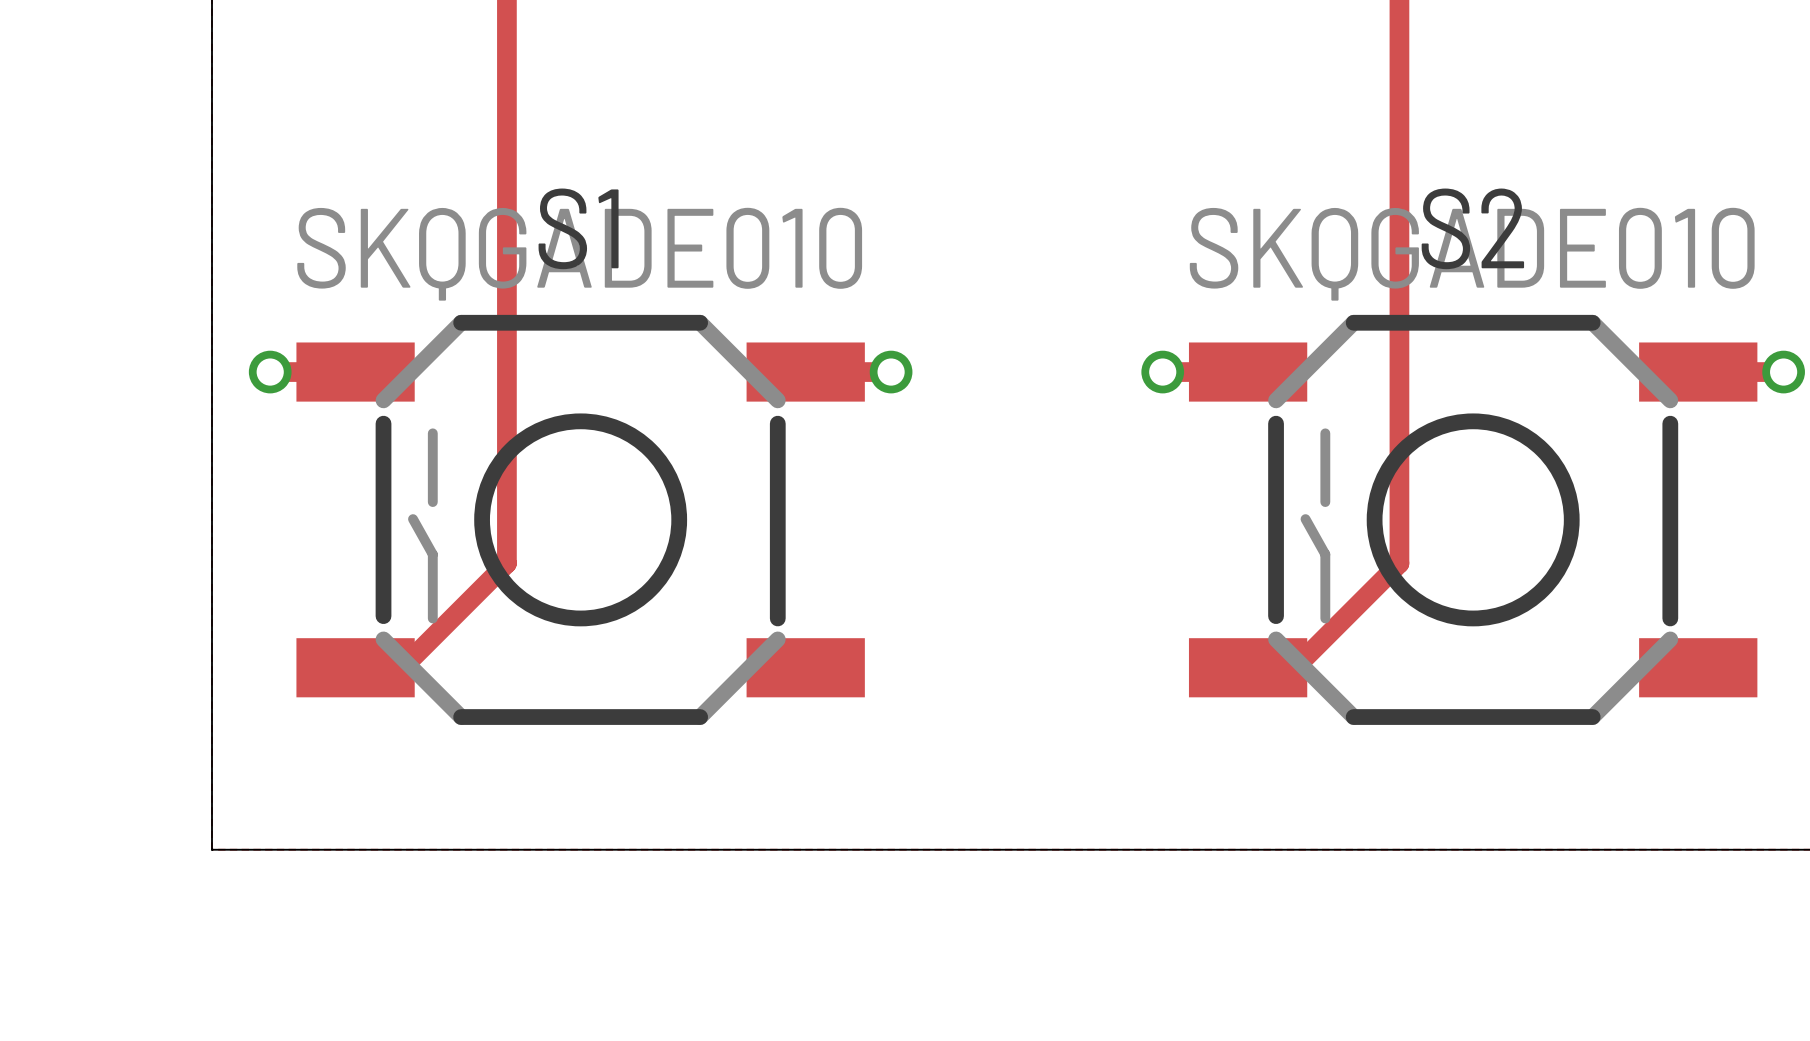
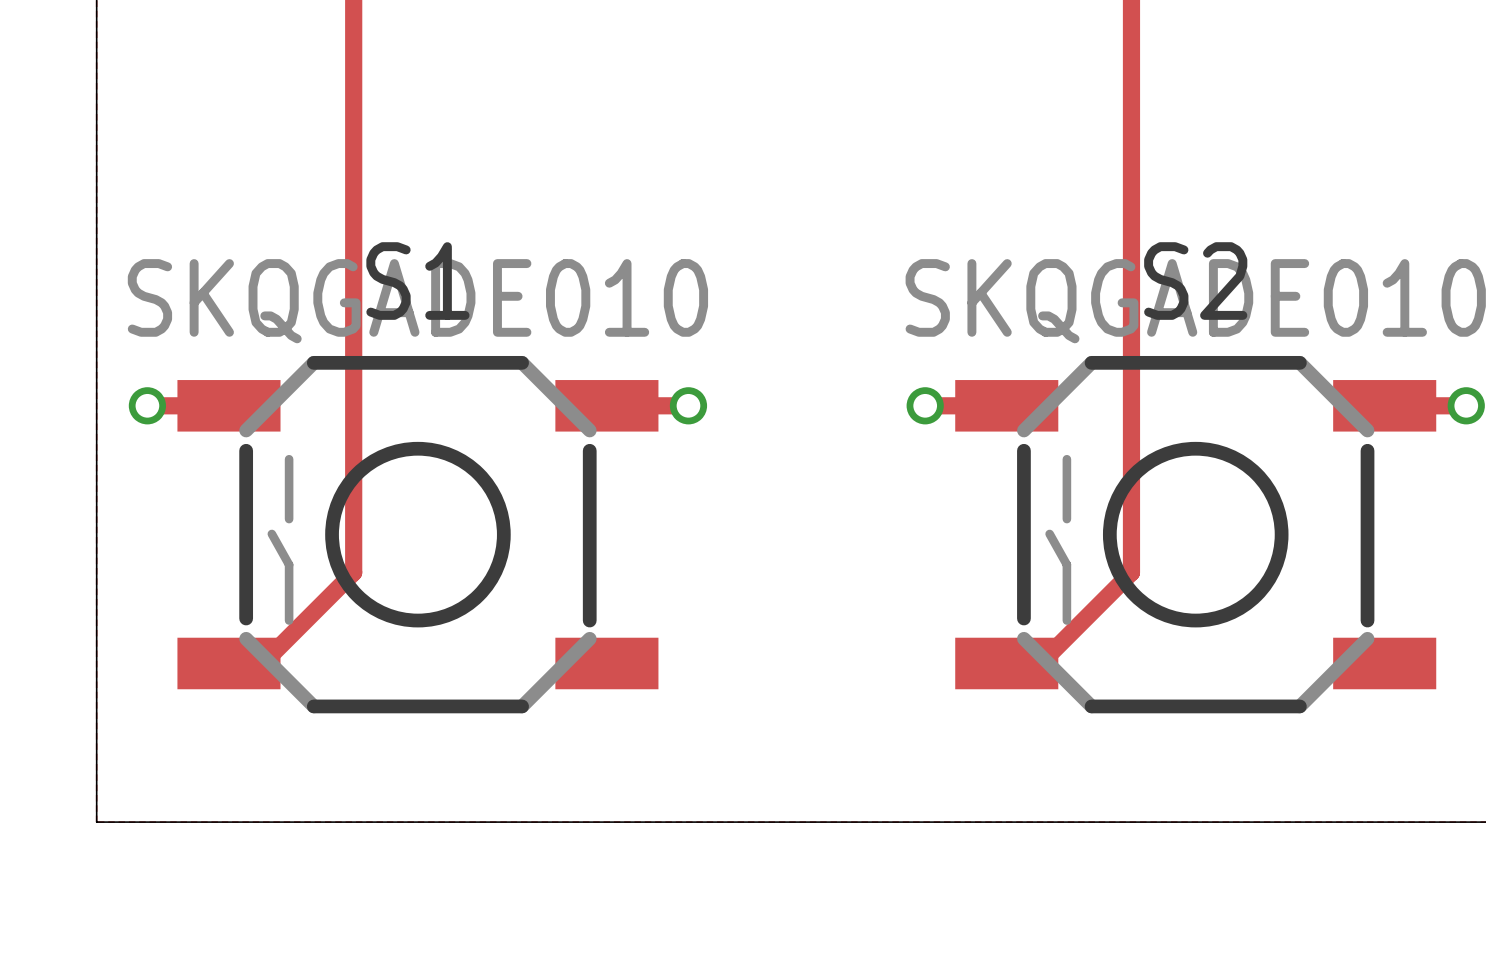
S1 footprint: [296, 314, 865, 725] -> [177, 355, 659, 714]
S2 footprint: [1188, 314, 1758, 725] -> [955, 355, 1437, 714]

